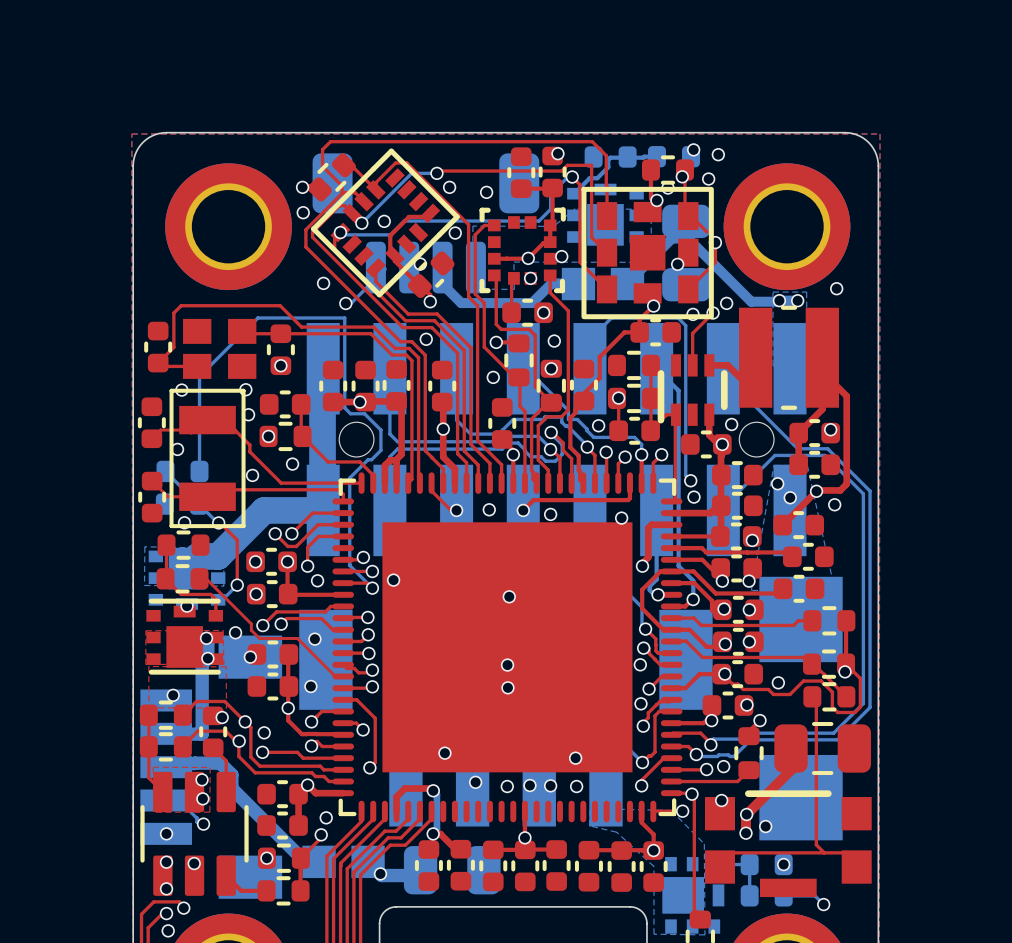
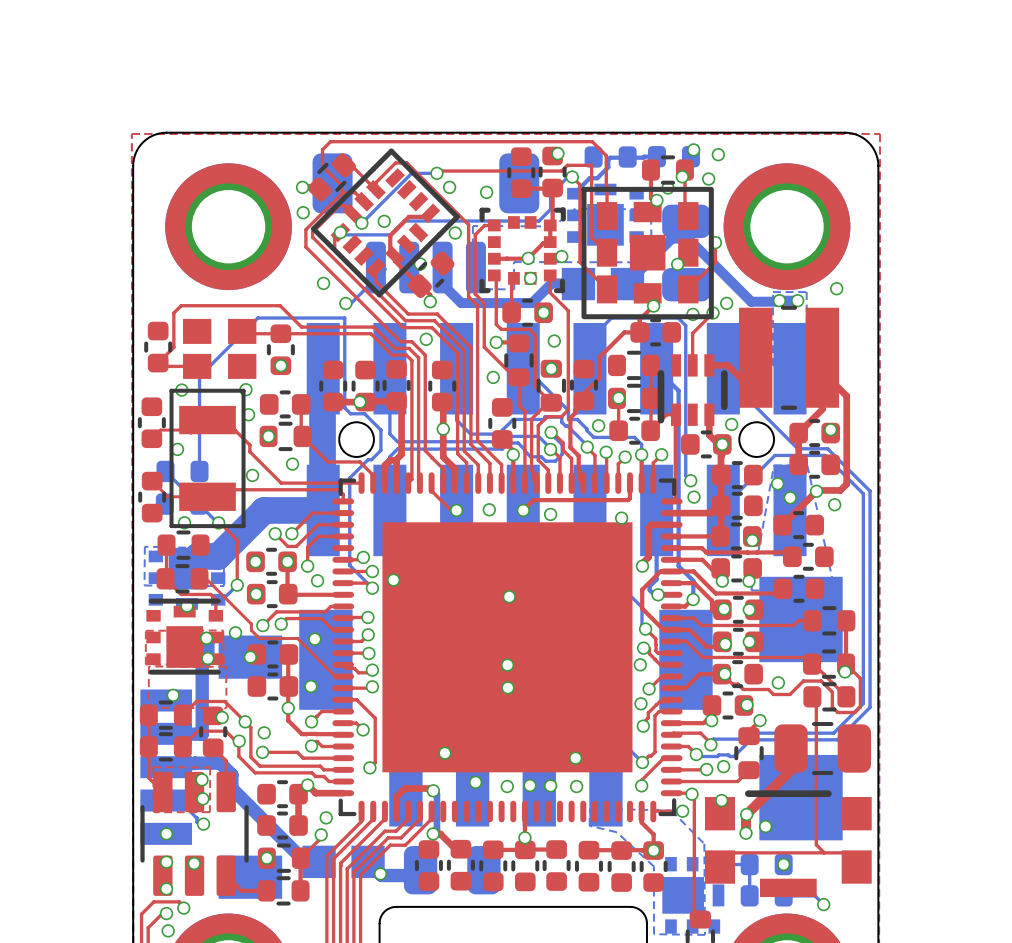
top track: (690, 216) (706, 232) -> none

